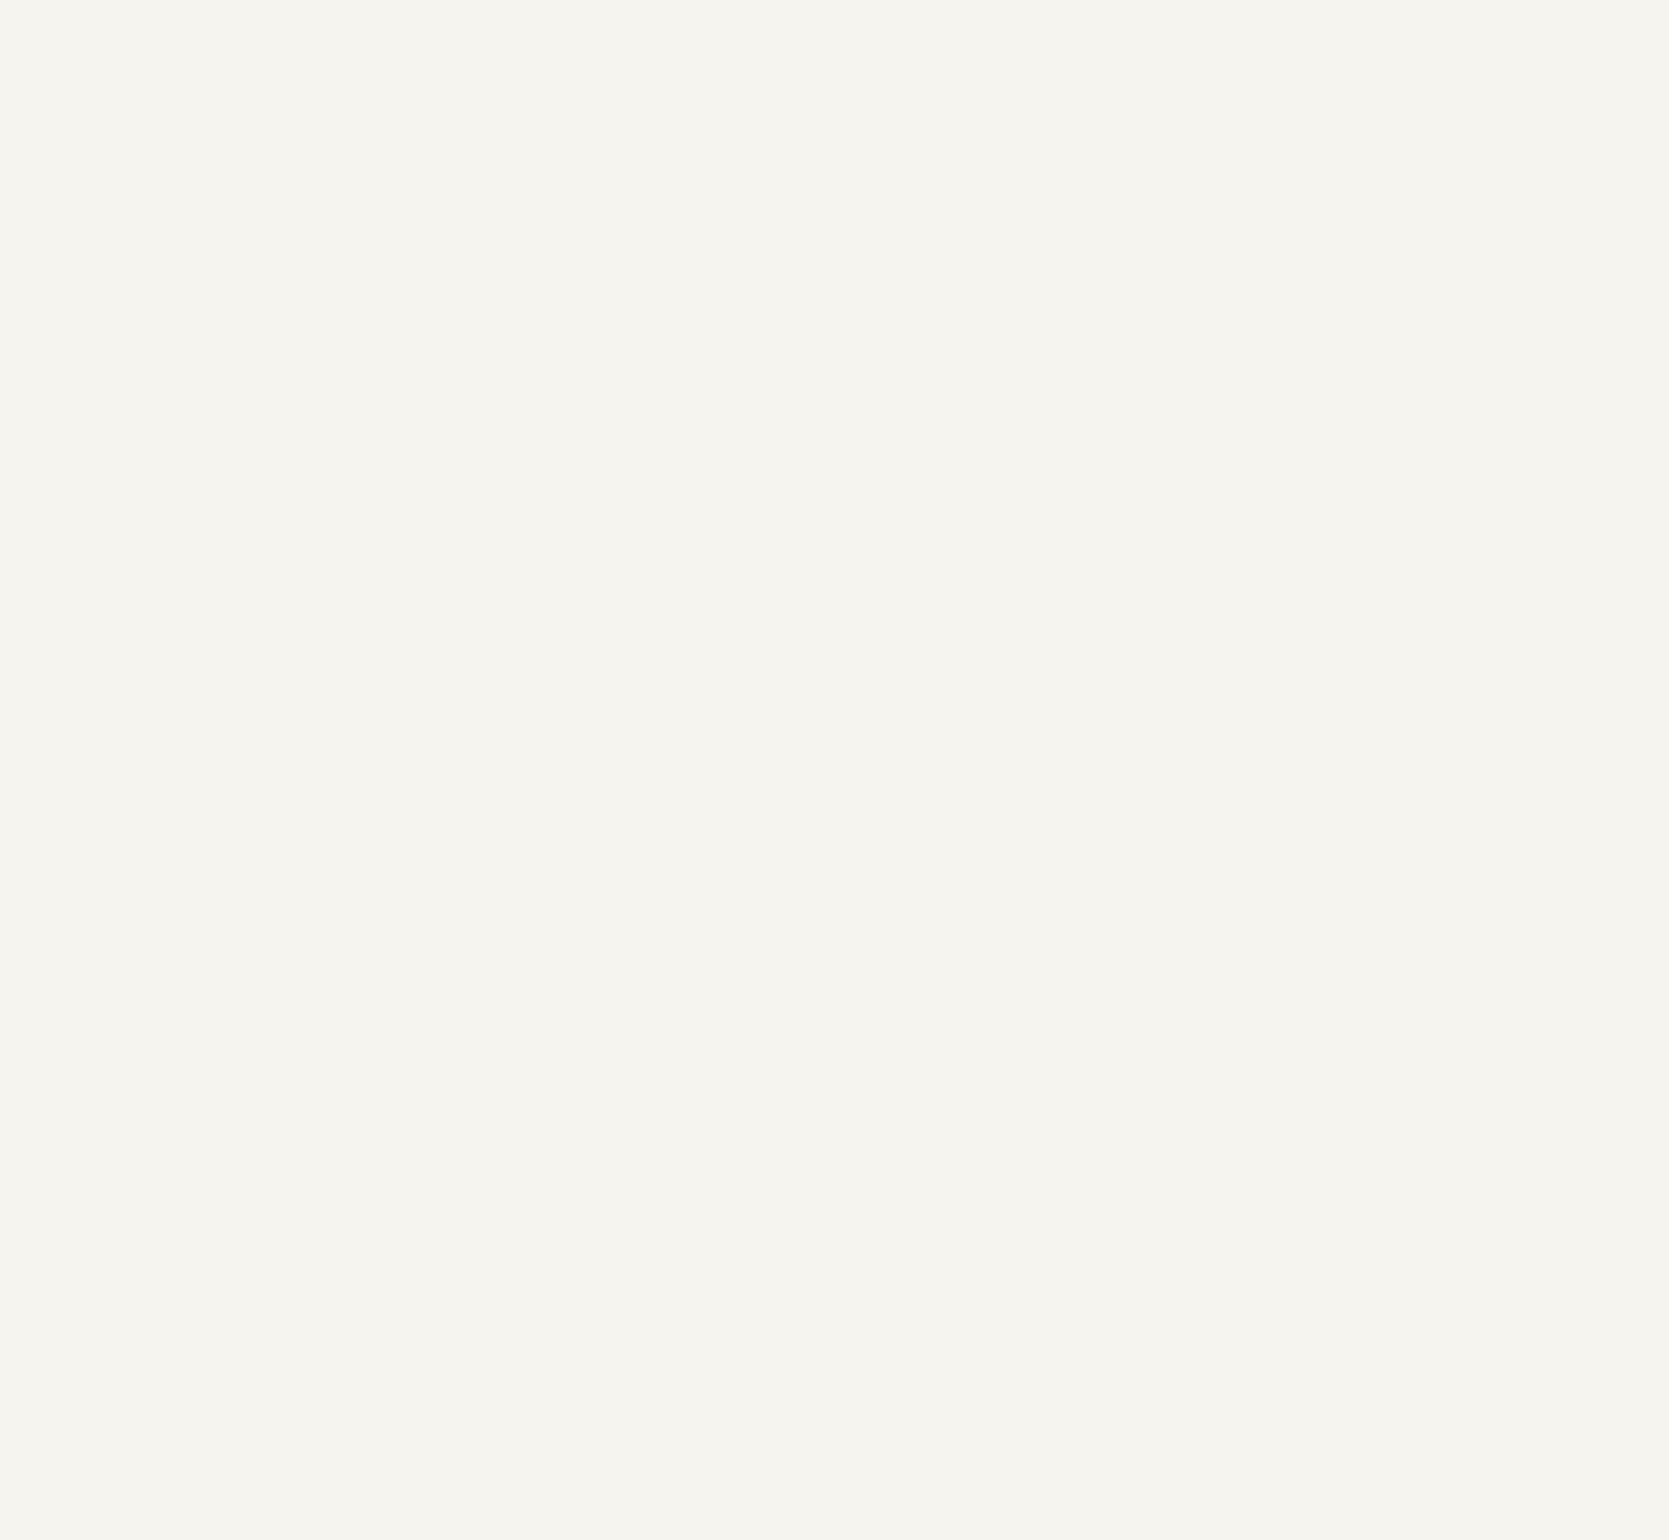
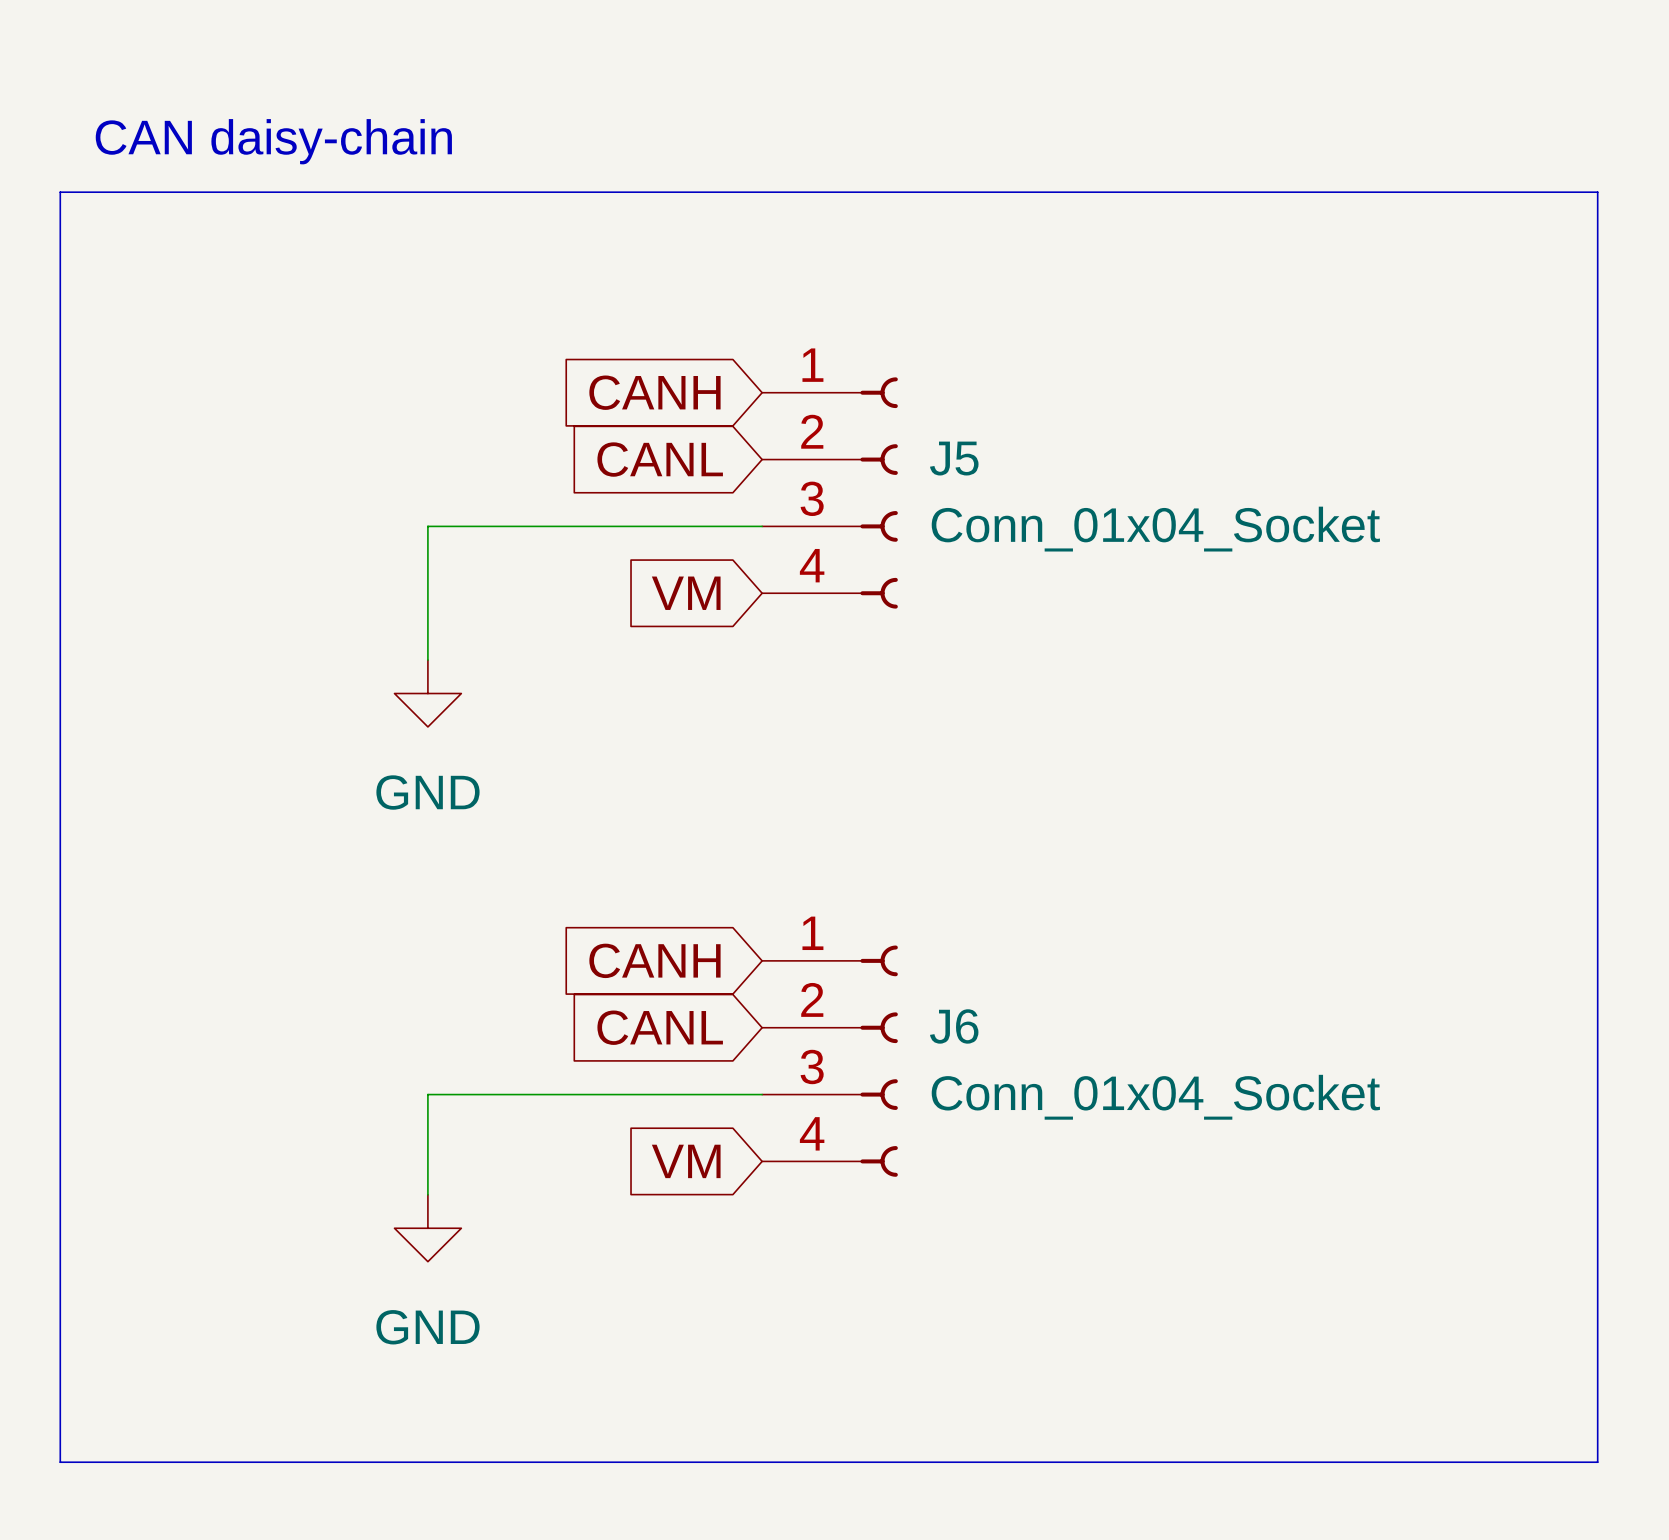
text: none -> CAN daisy-chain (273, 141)
line: none -> (60, 192) (60, 1462) (1597, 1462) (1597, 192) (60, 192)
global label: none -> CANH (654, 392)
global label: none -> CANL (660, 459)
J5: none -> Conn_01x04_Socket (829, 492)
wire: none -> (762, 526) (427, 526) (427, 660)
global label: none -> VM (686, 593)
power symbol: none -> GND (427, 693)
global label: none -> CANH (654, 960)
global label: none -> CANL (660, 1027)
J6: none -> Conn_01x04_Socket (829, 1061)
wire: none -> (762, 1094) (427, 1094) (427, 1194)
global label: none -> VM (686, 1161)
power symbol: none -> GND (427, 1228)

